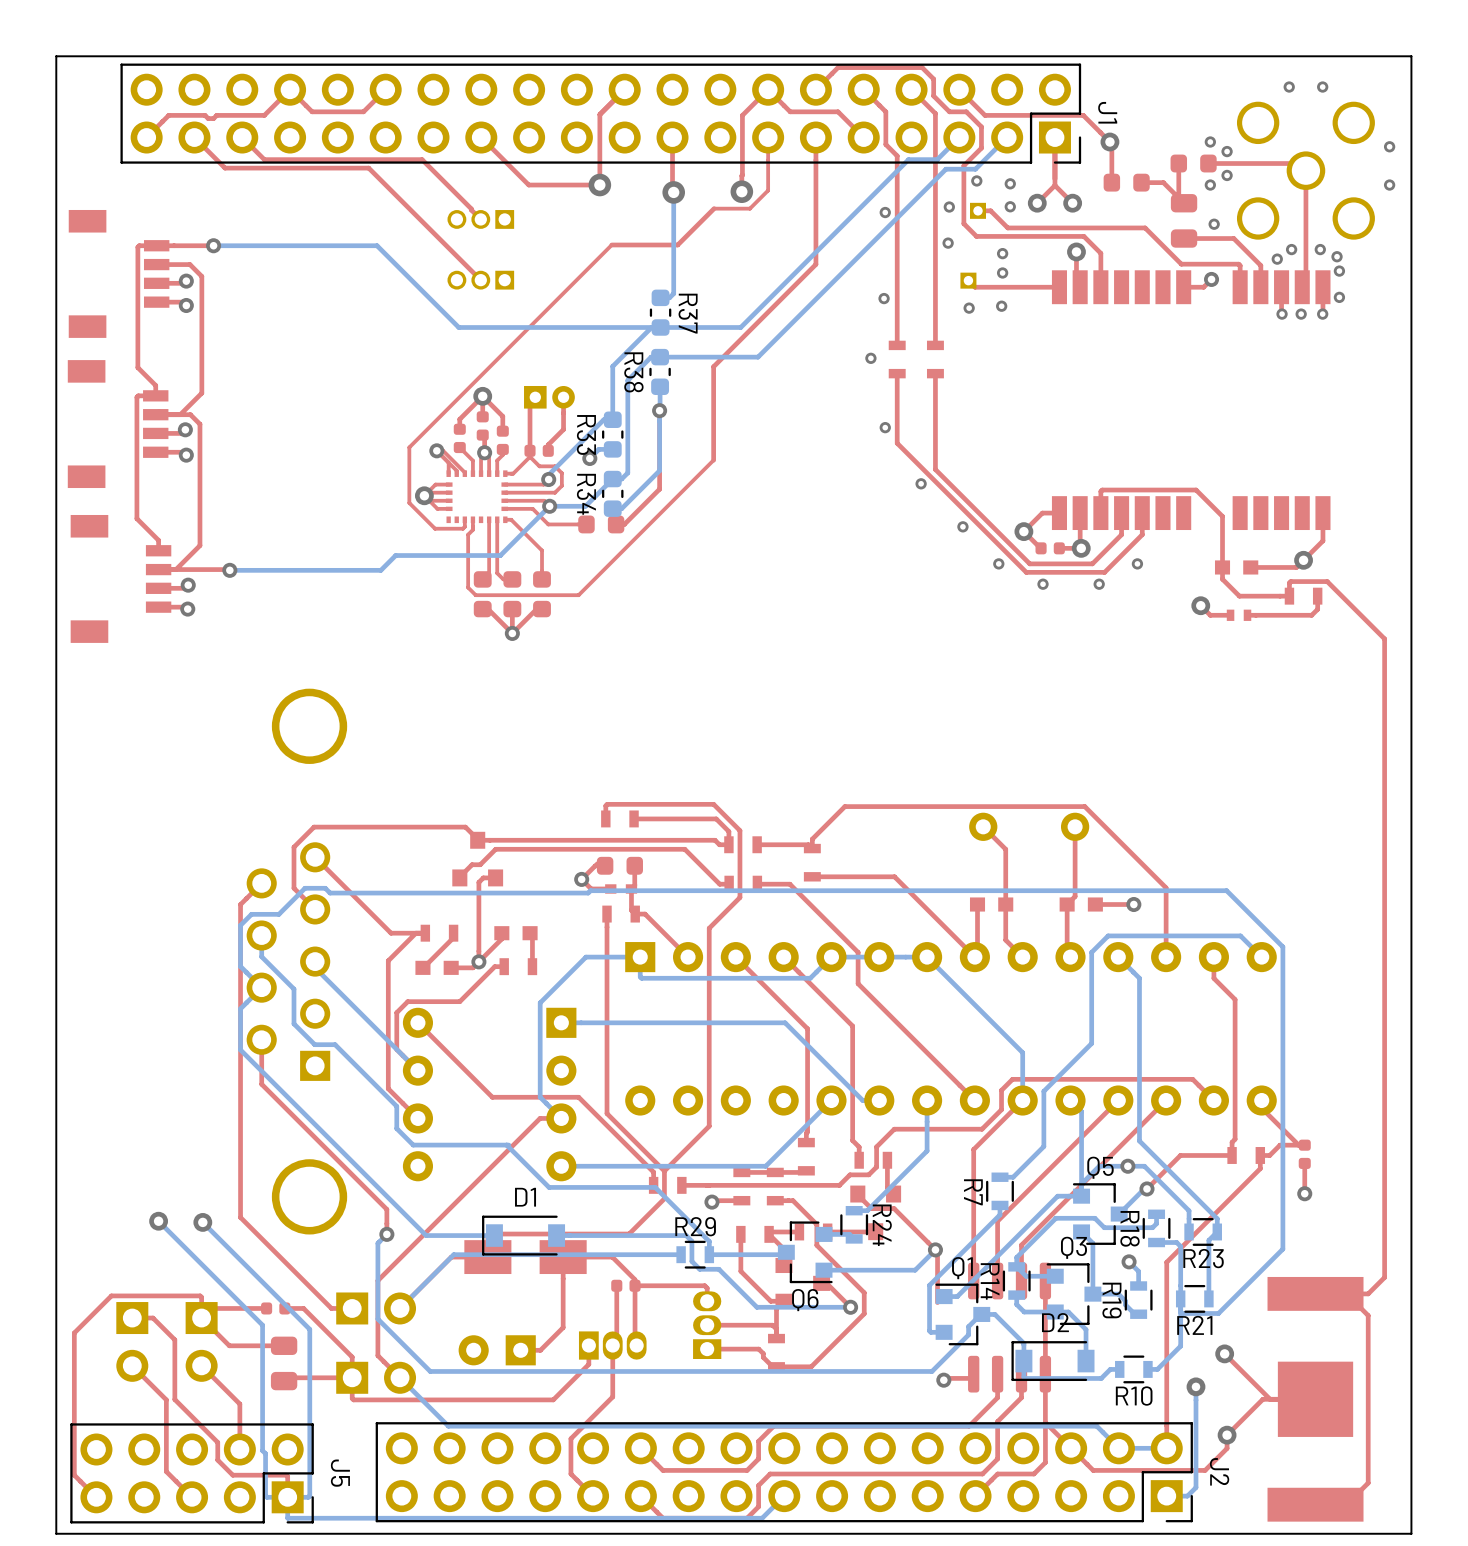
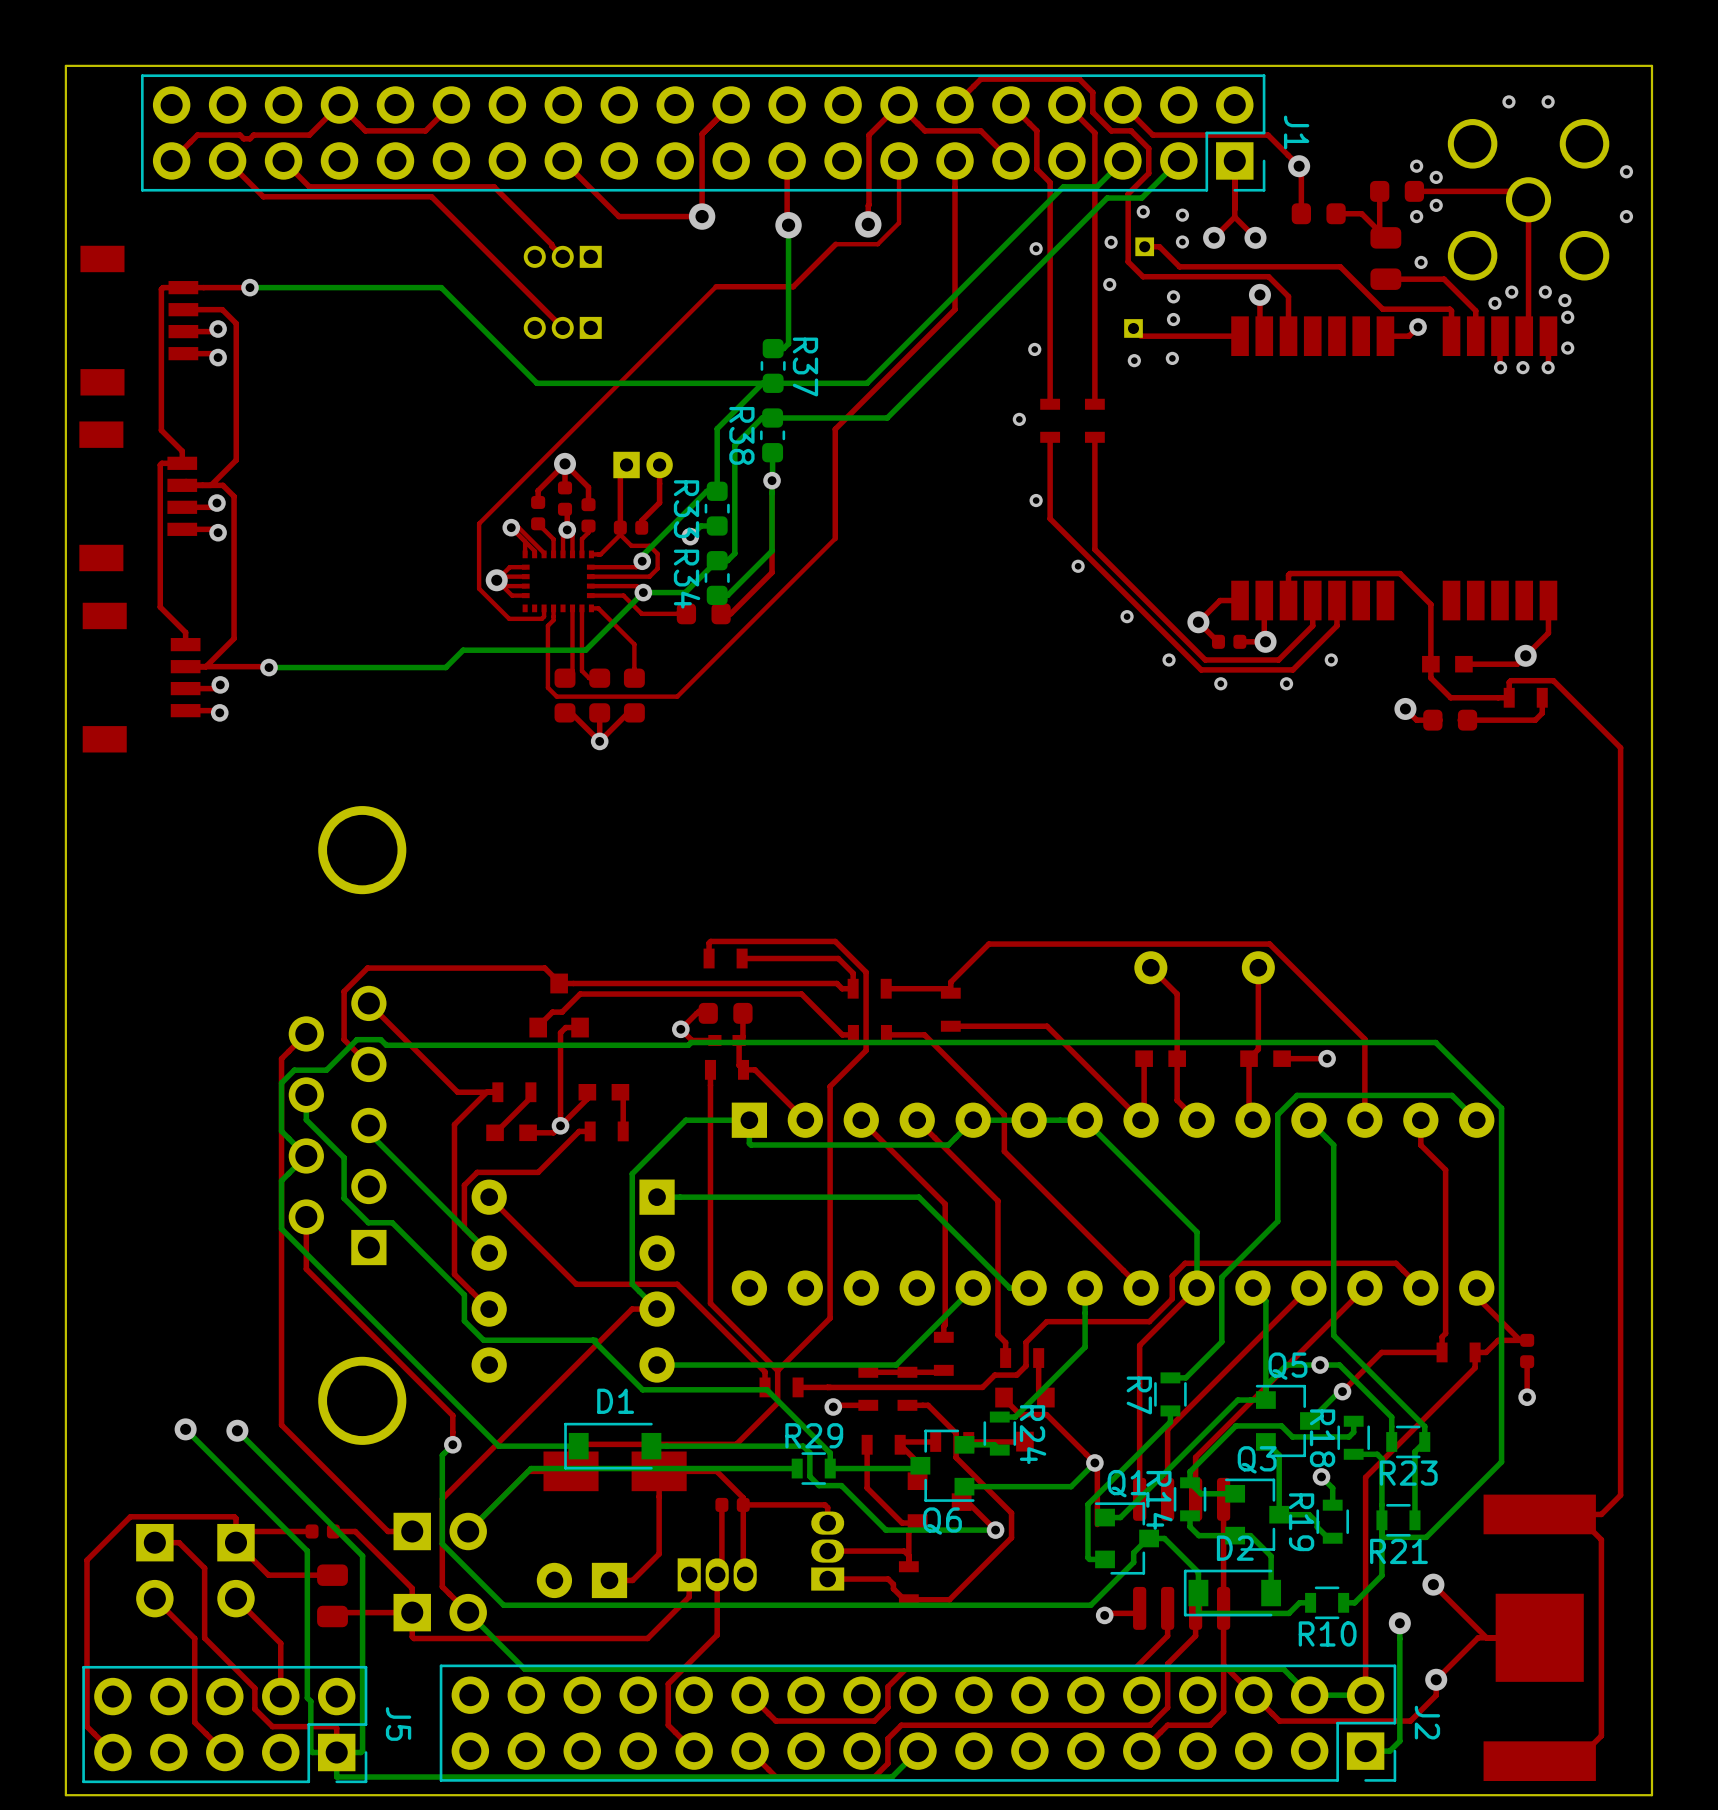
part footprint: [1226, 609, 1252, 621] -> [1423, 709, 1478, 731]

